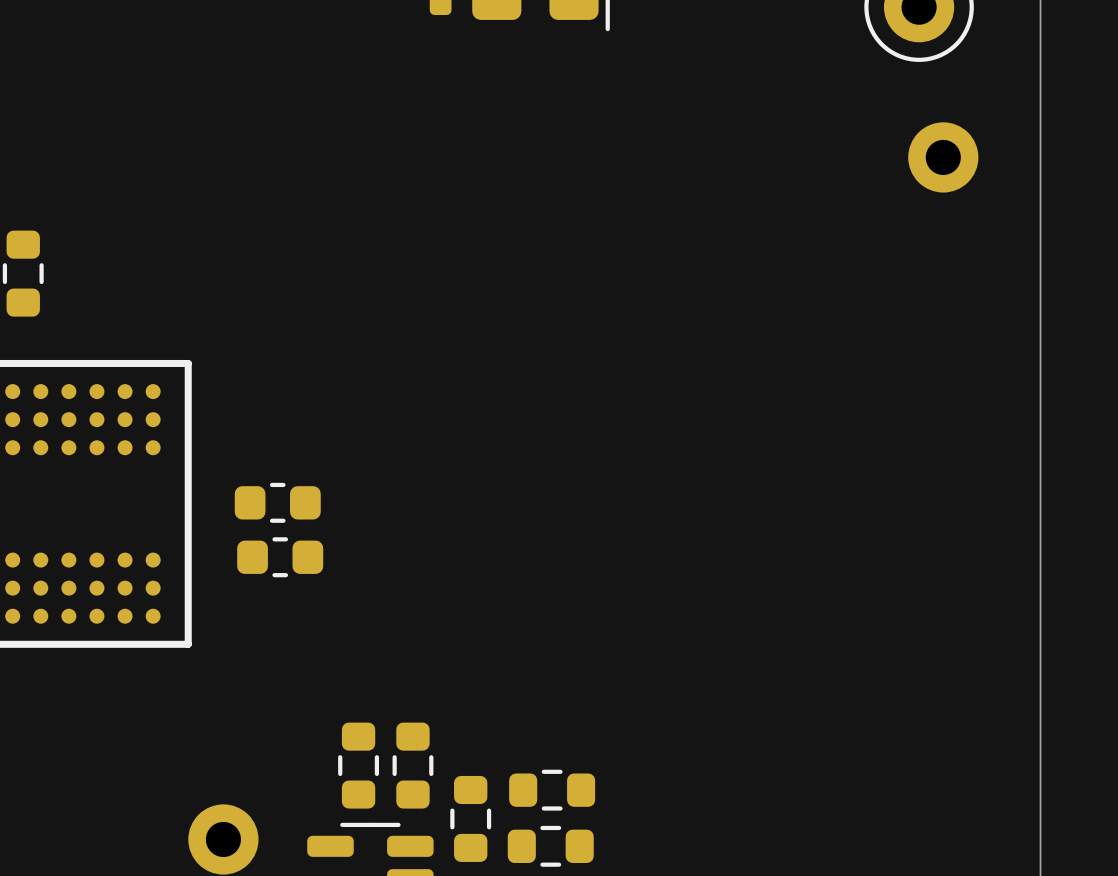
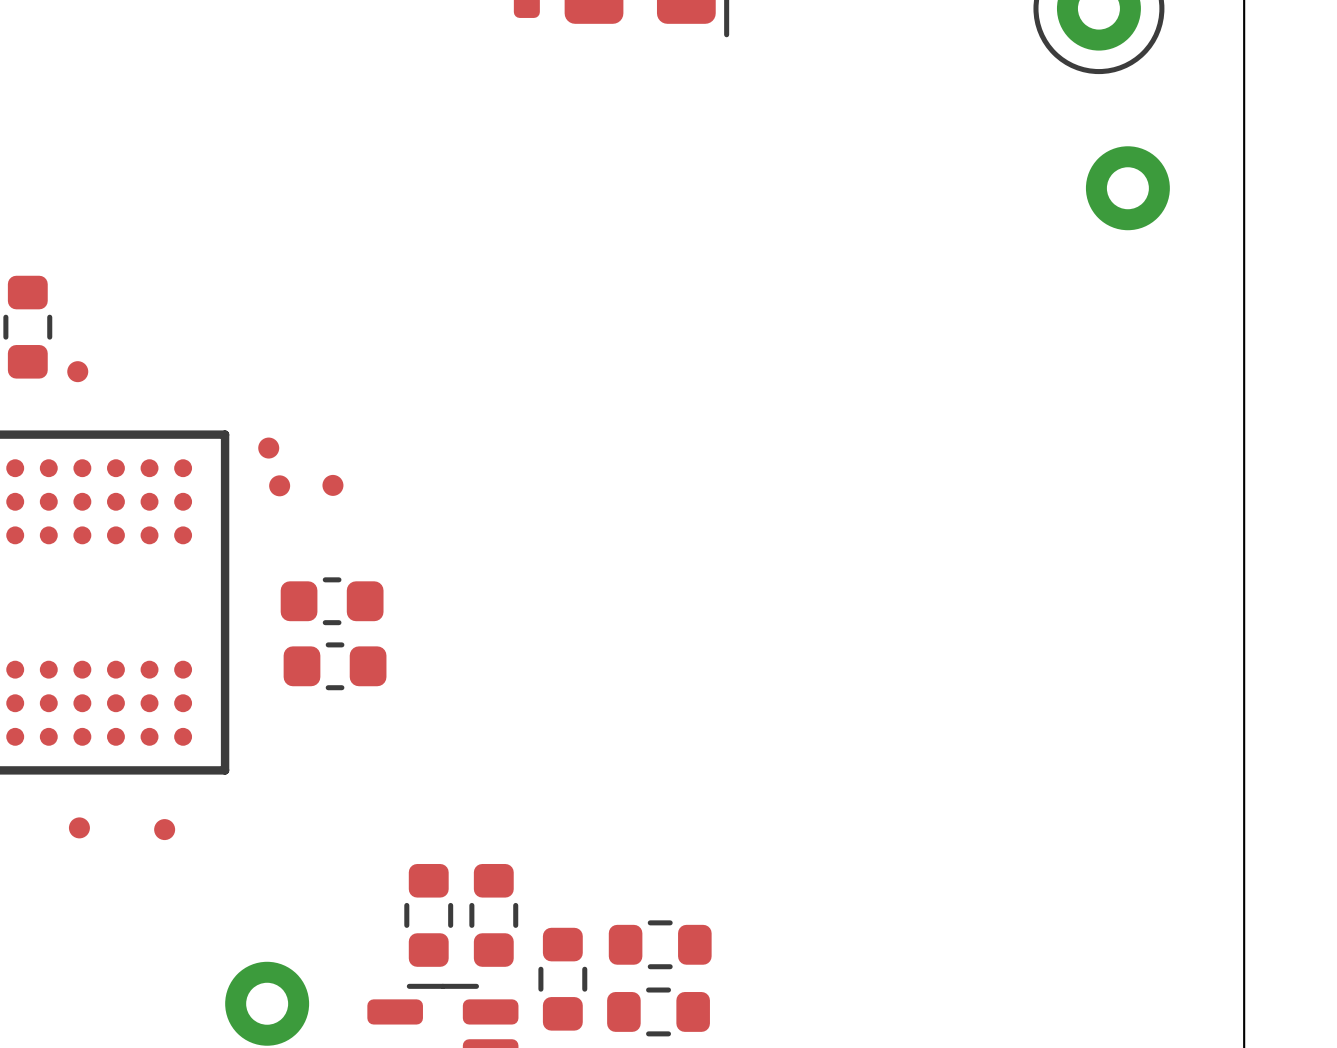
part: none -> (77, 371)
part: none -> (268, 448)
part: none -> (332, 485)
part: none -> (279, 485)
part: none -> (79, 827)
part: none -> (164, 829)

